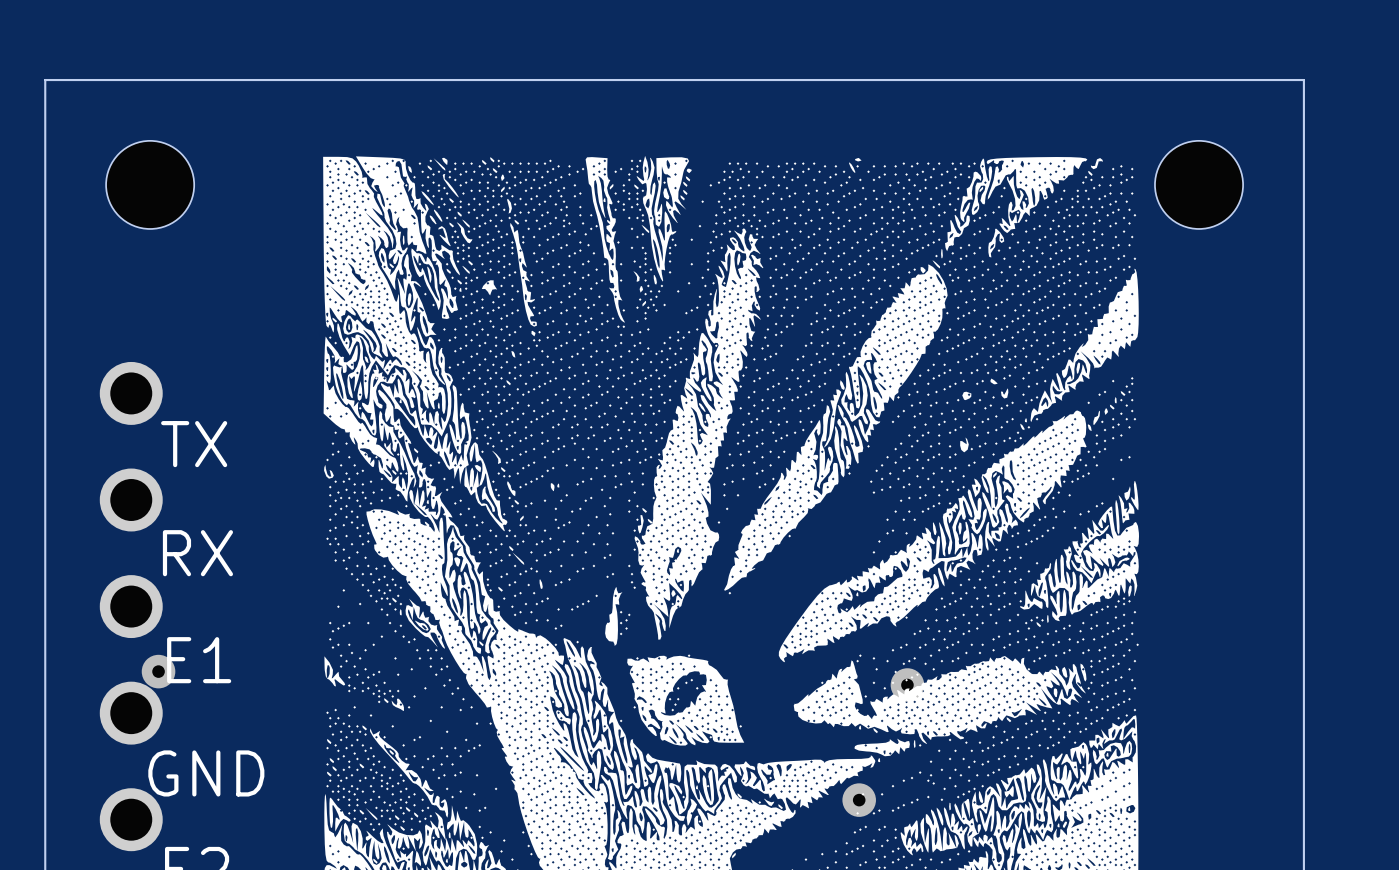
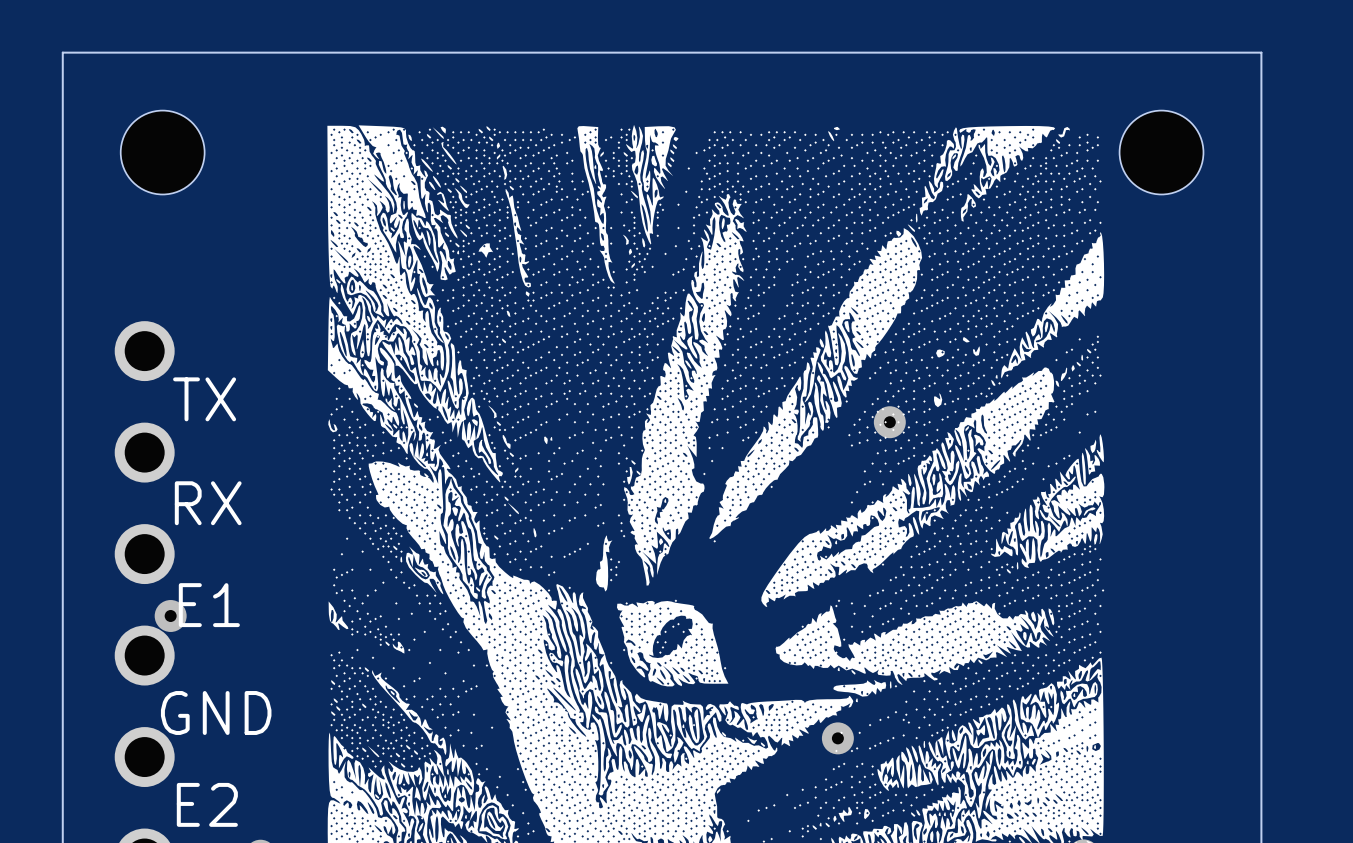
via position: (907, 685) -> (889, 422)

